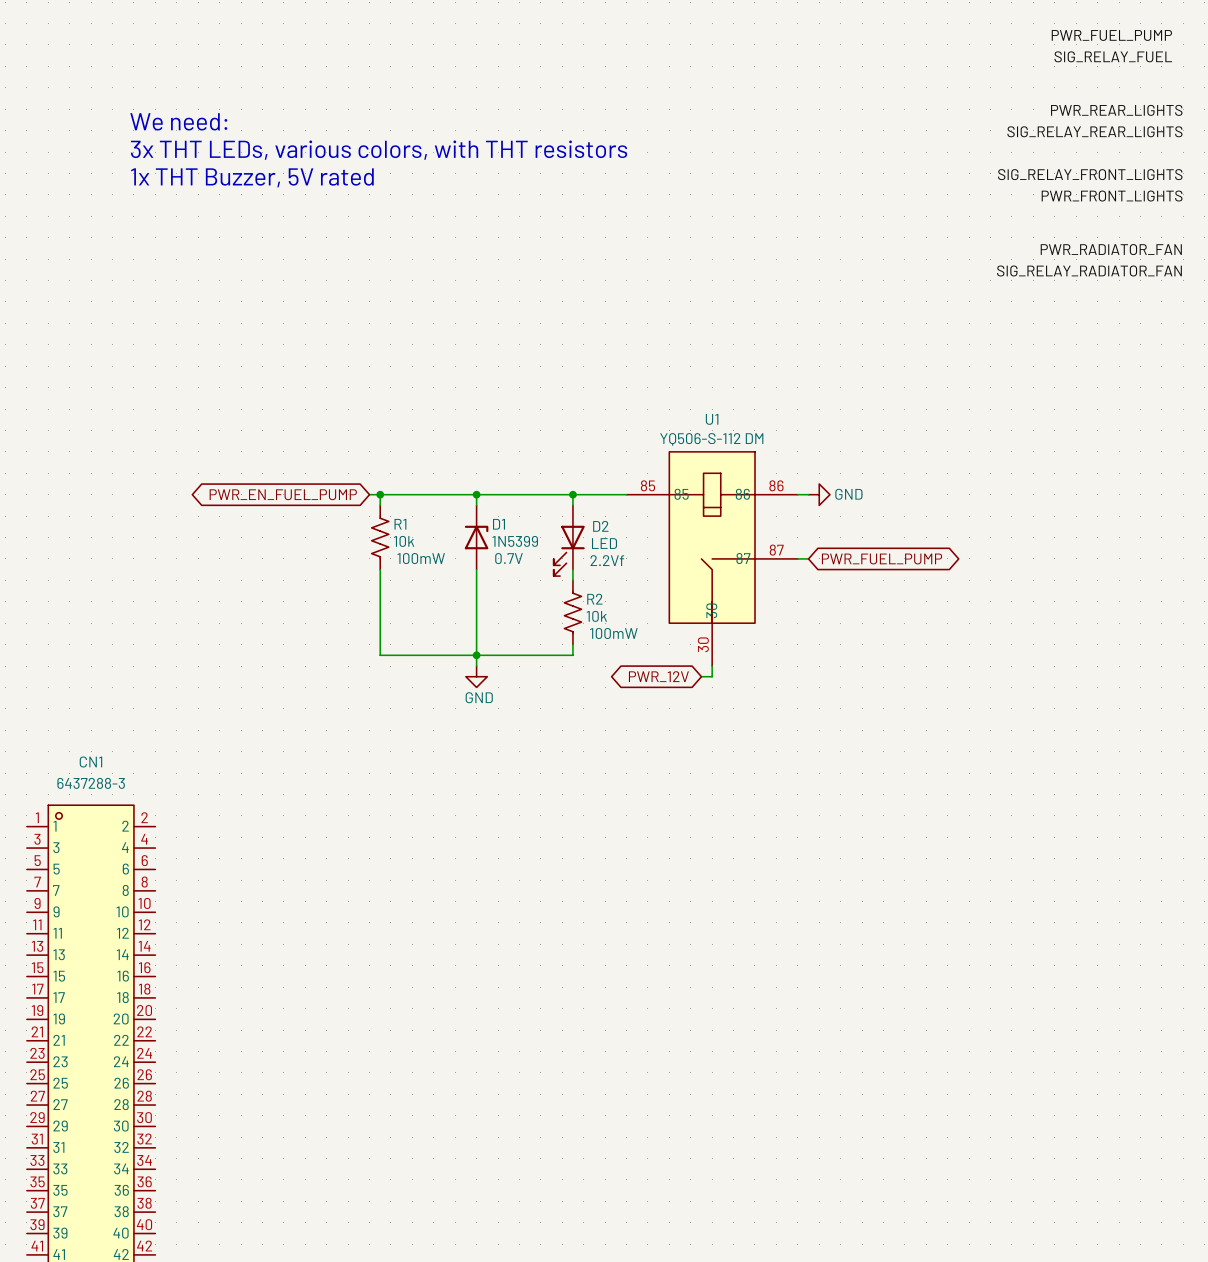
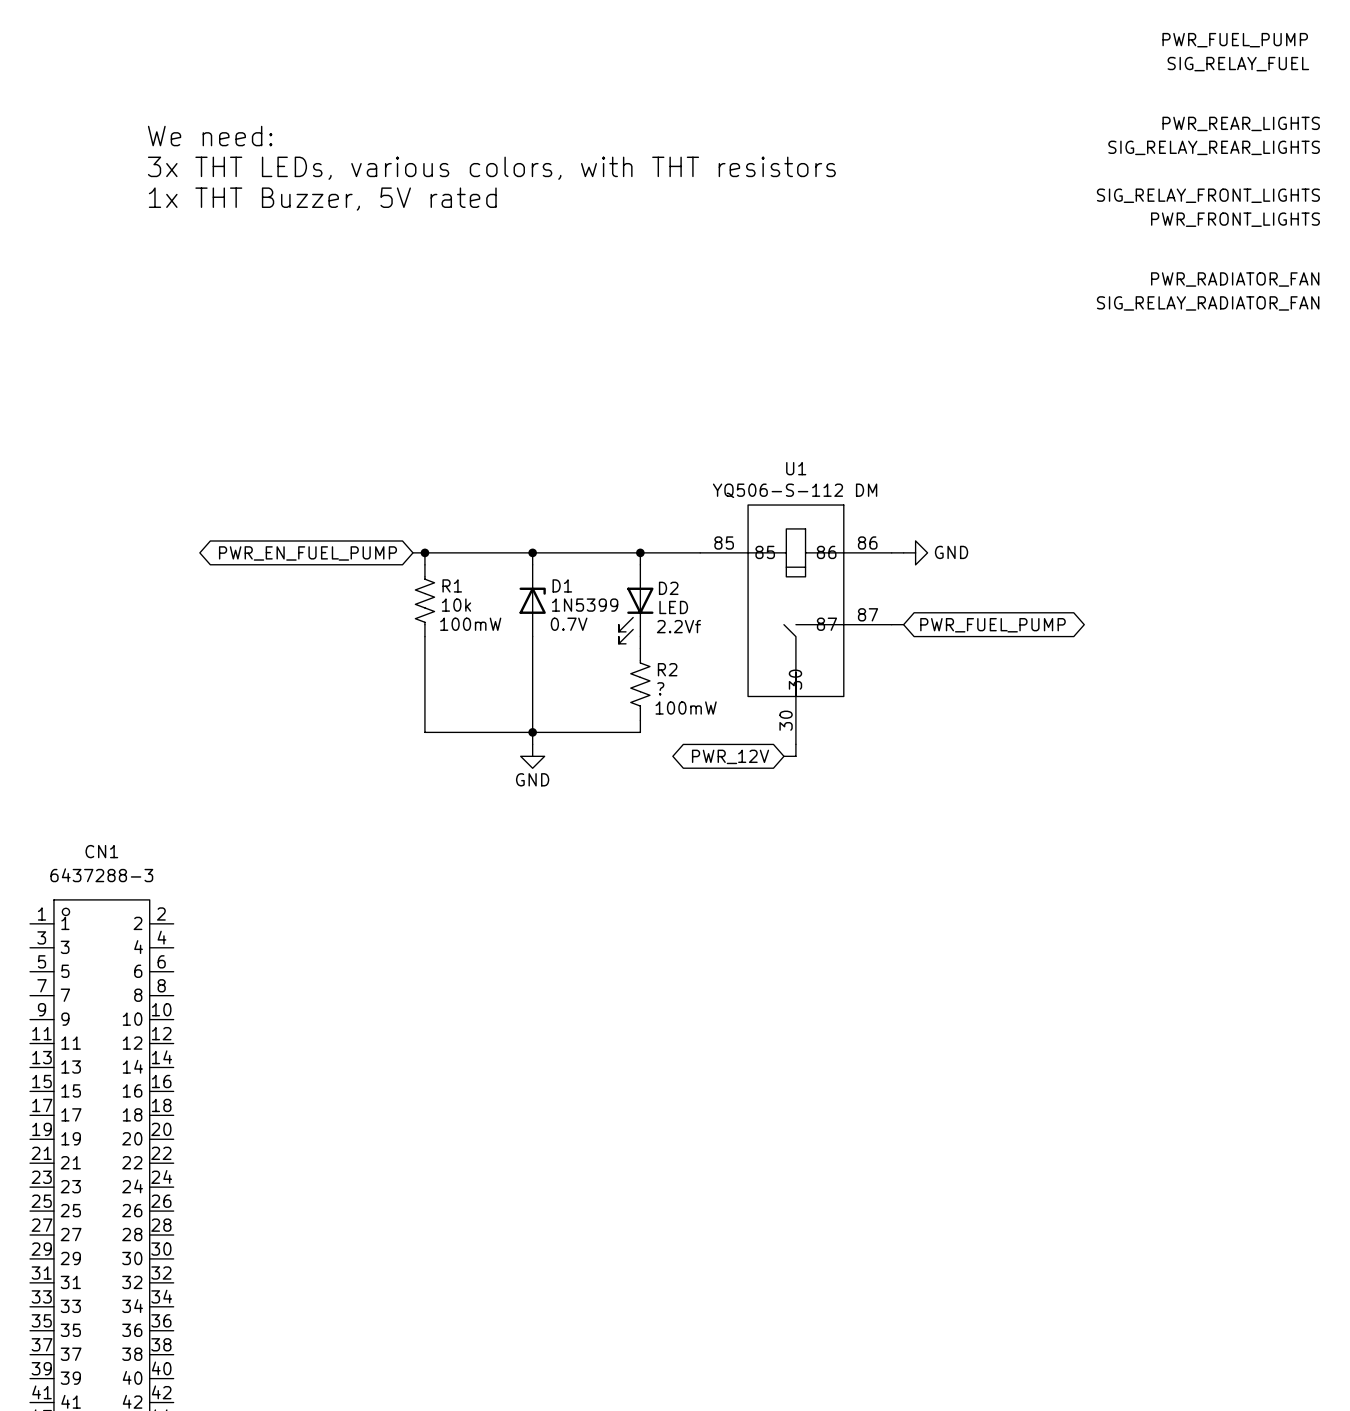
R2 value: 10k (596, 616) -> ? (660, 688)

